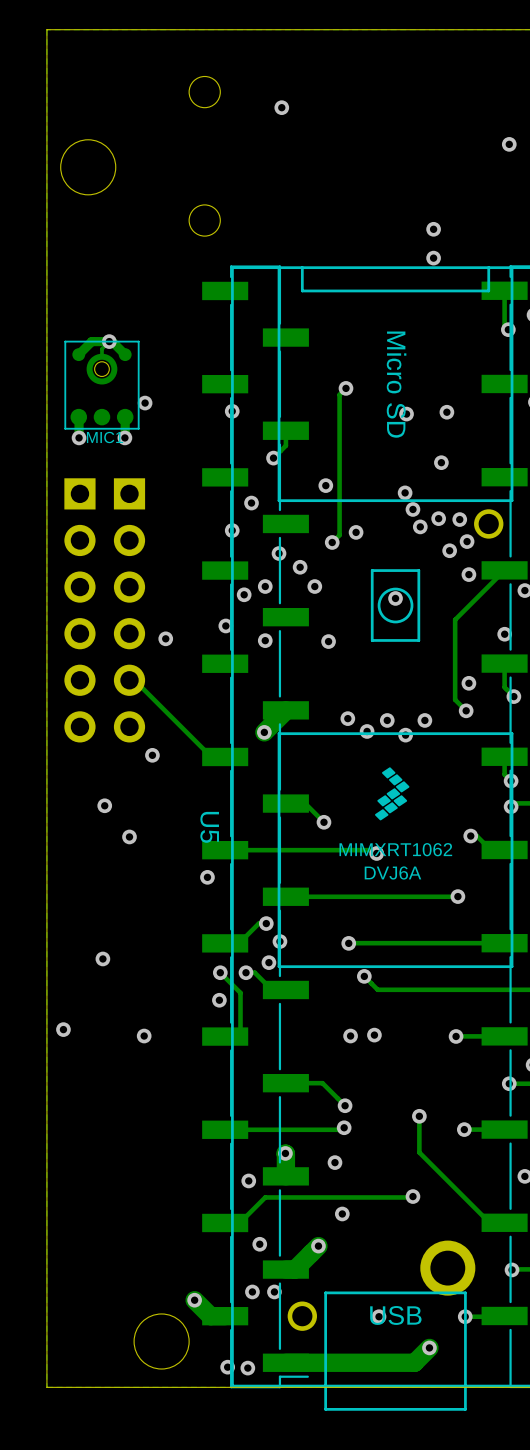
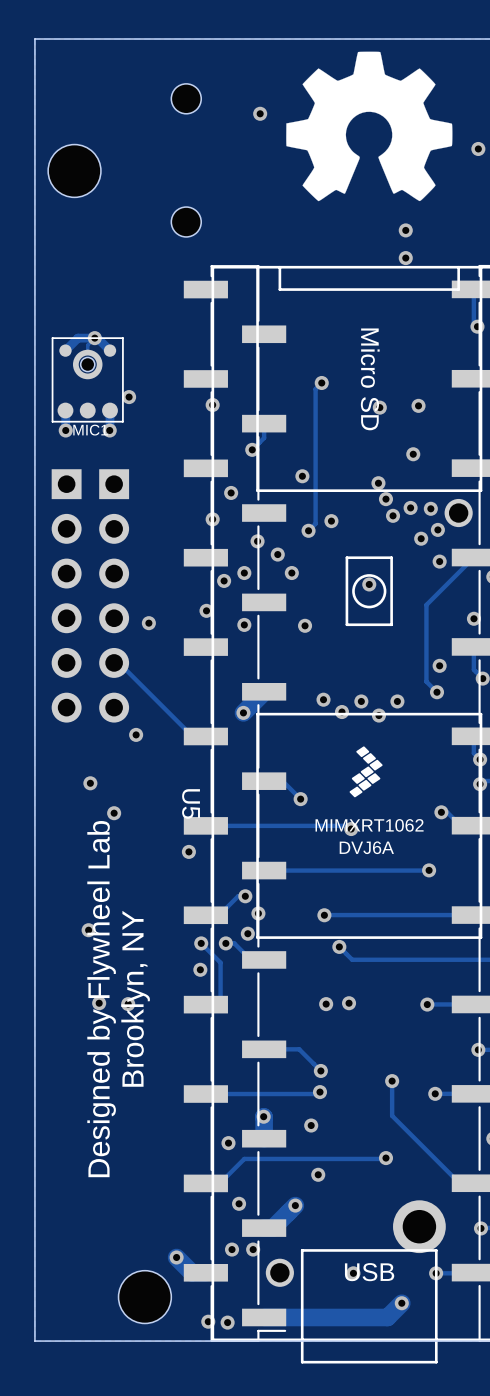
drawing: none -> [286, 51, 453, 202]
via position: (63, 1029) -> (99, 1003)
text: none -> Designed by Flywheel Lab (101, 999)
text: none -> Brooklyn, NY (135, 998)

